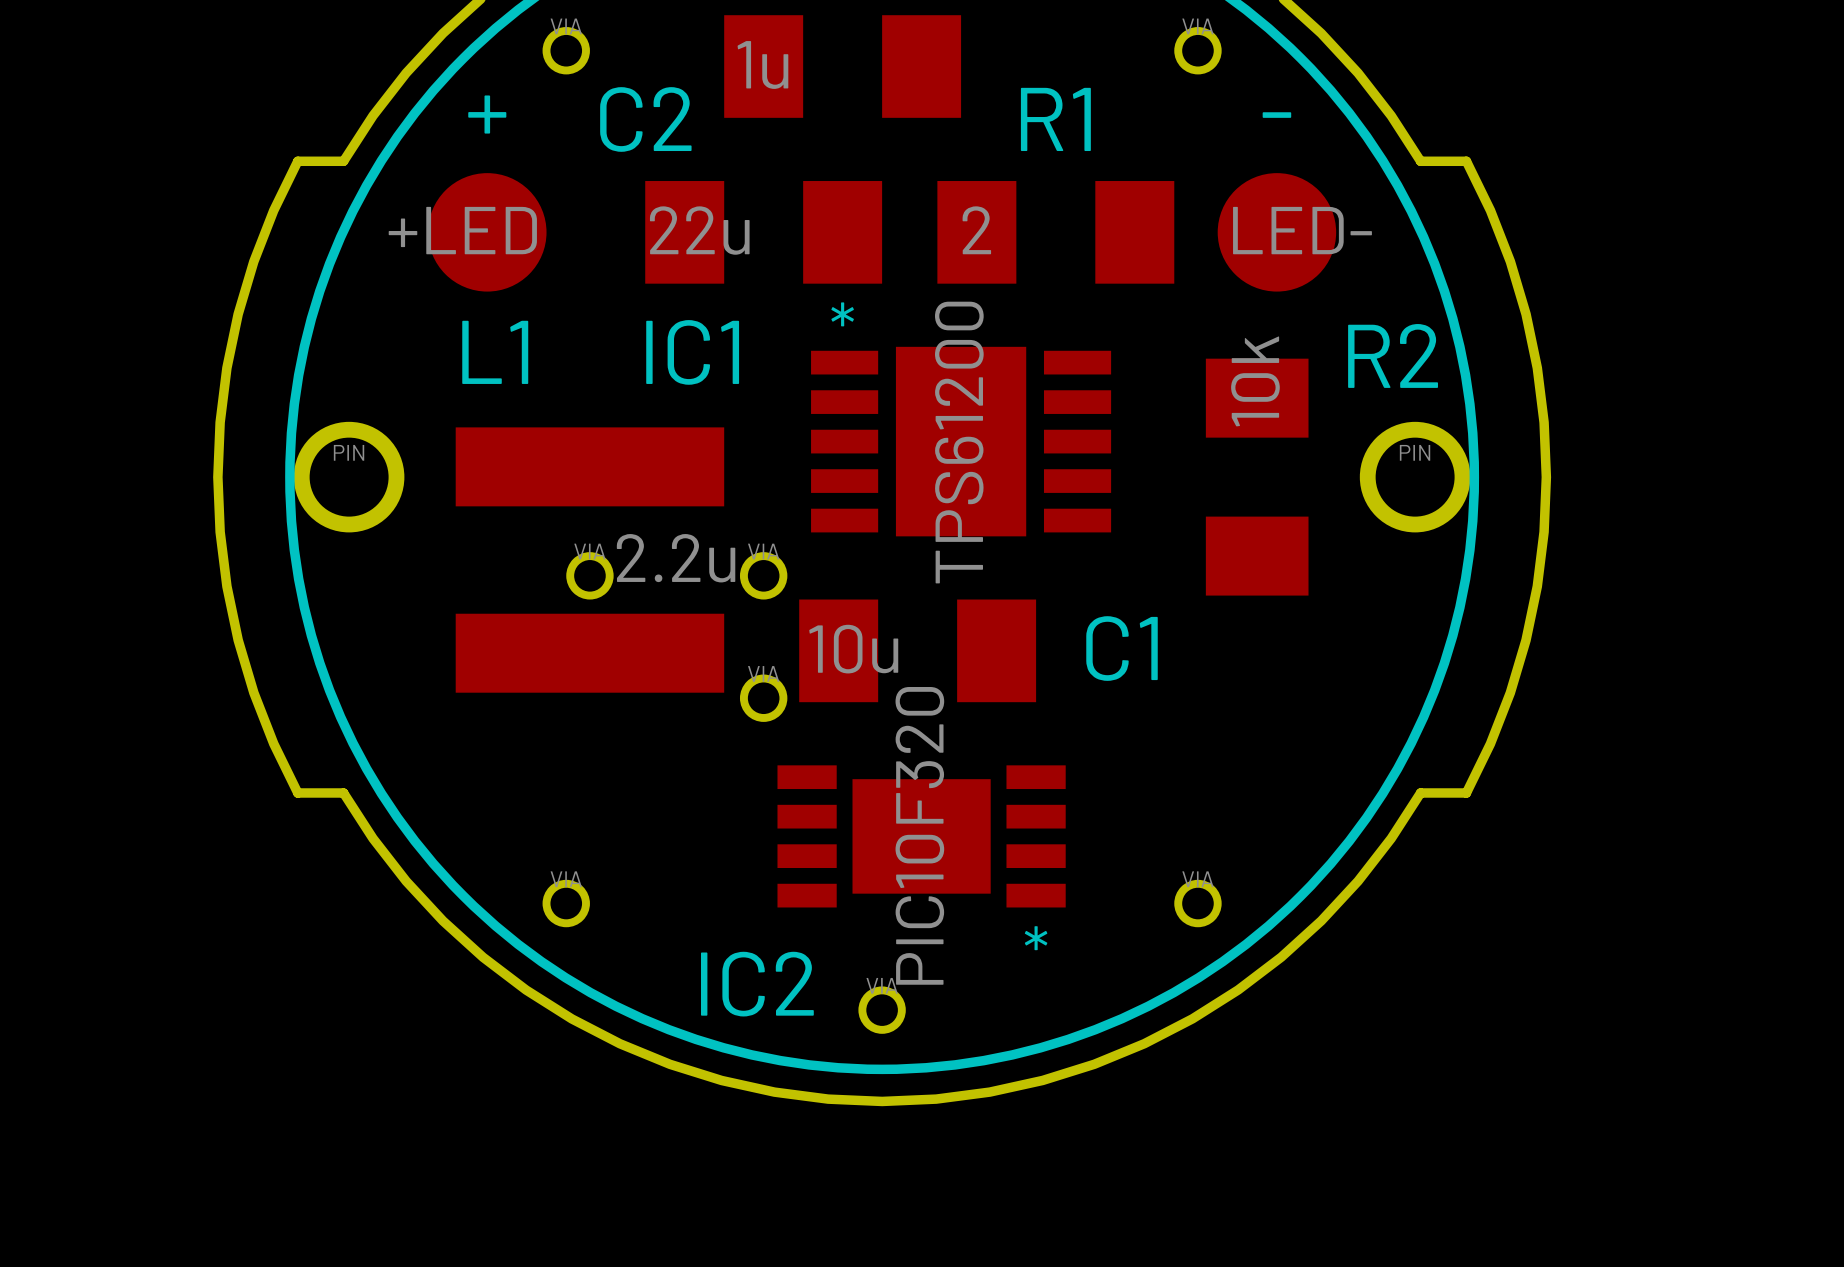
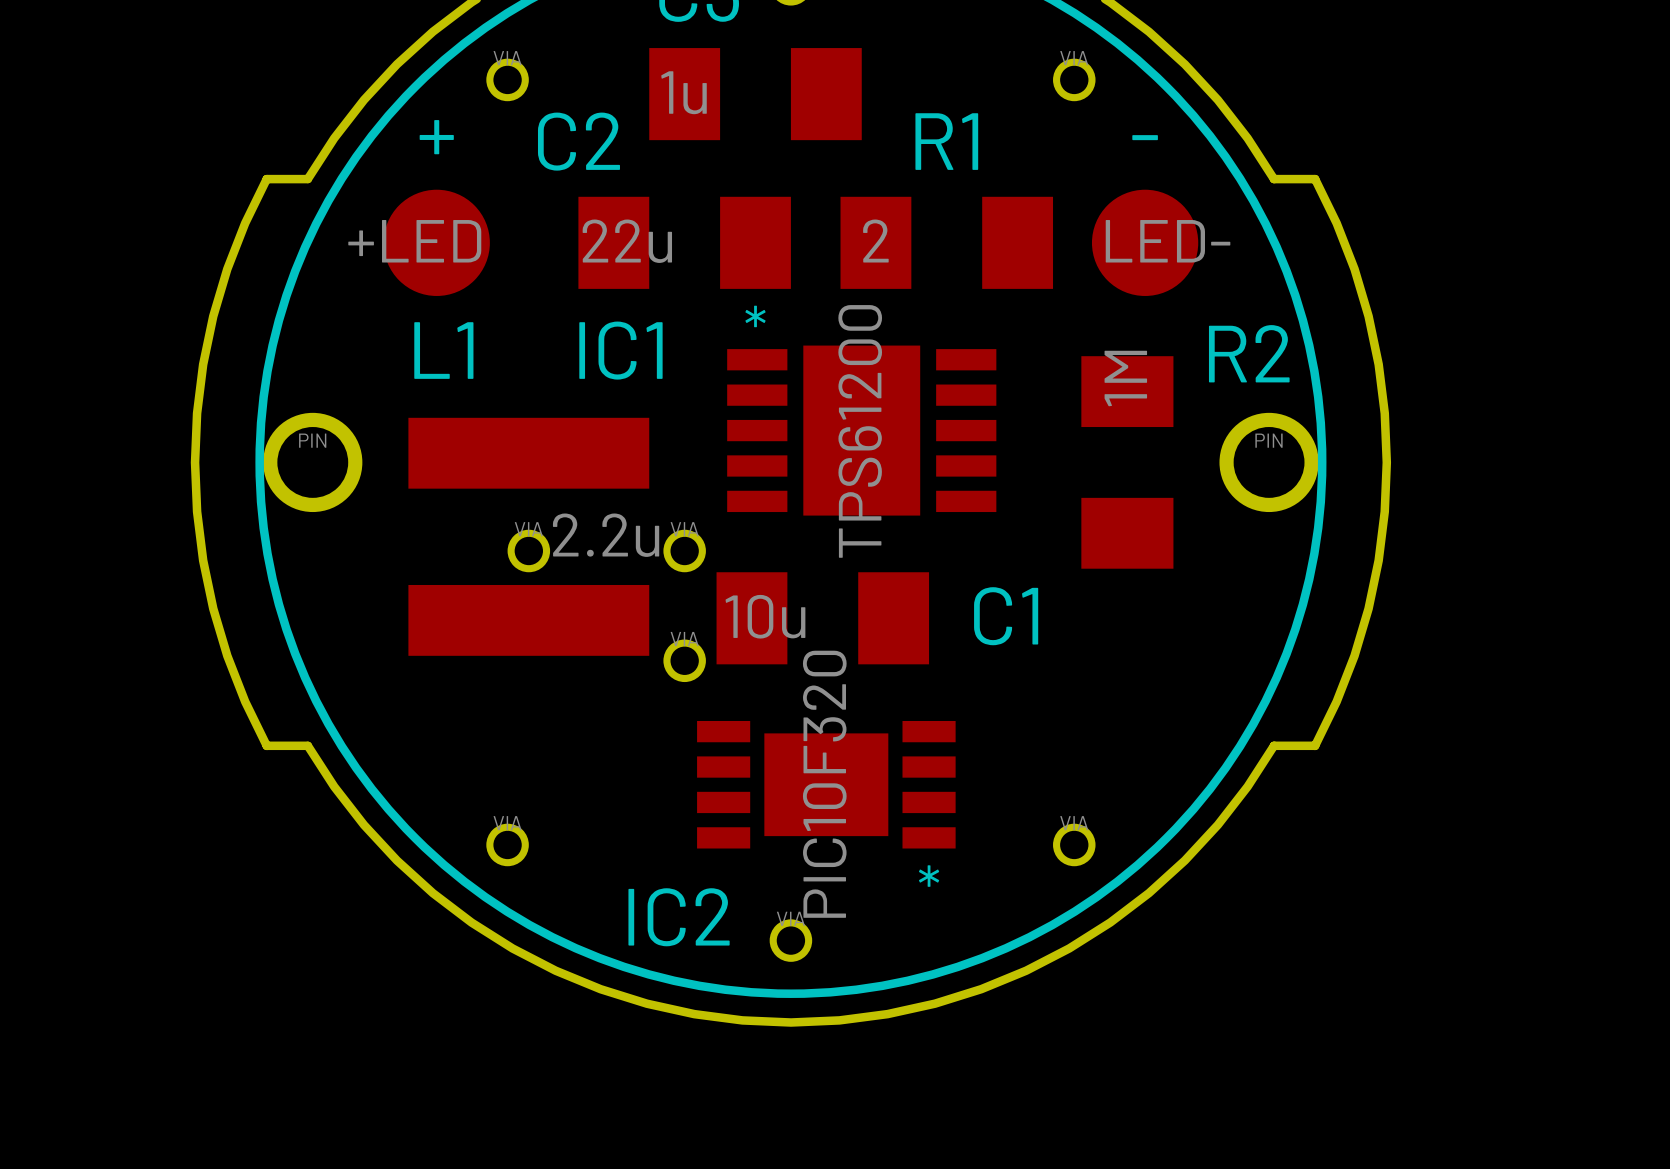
R2 value: 10k (1255, 381) -> 1M (1125, 378)

